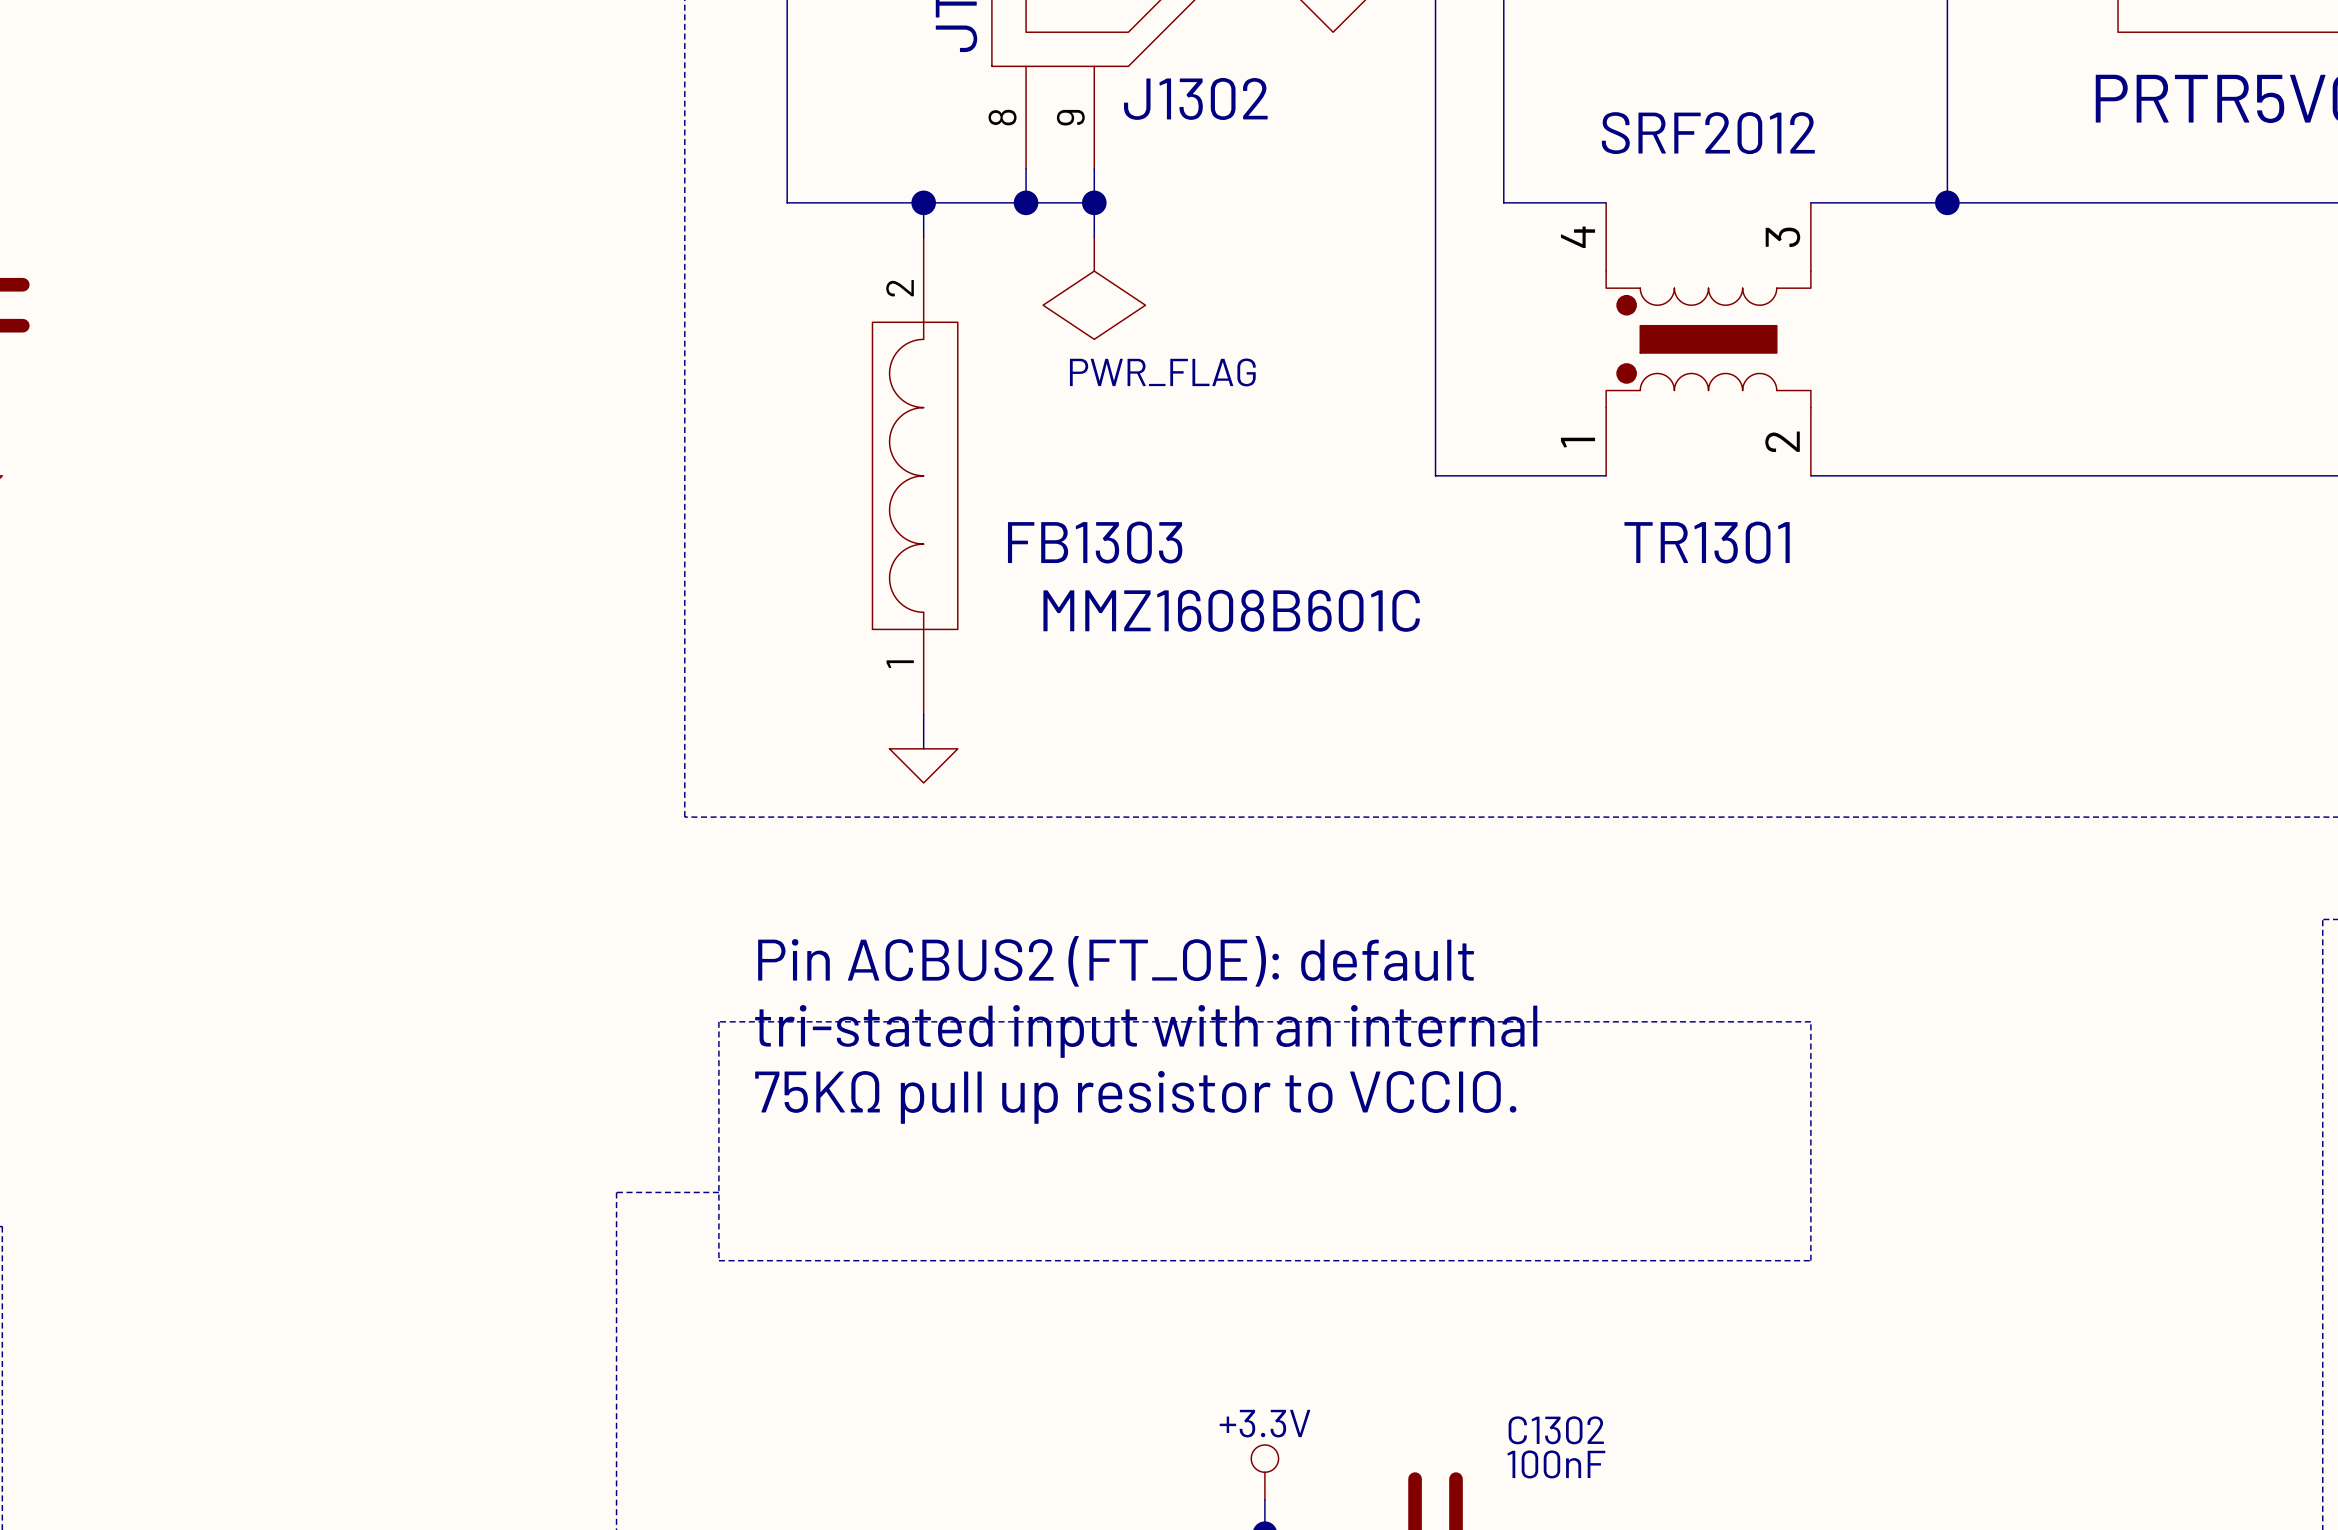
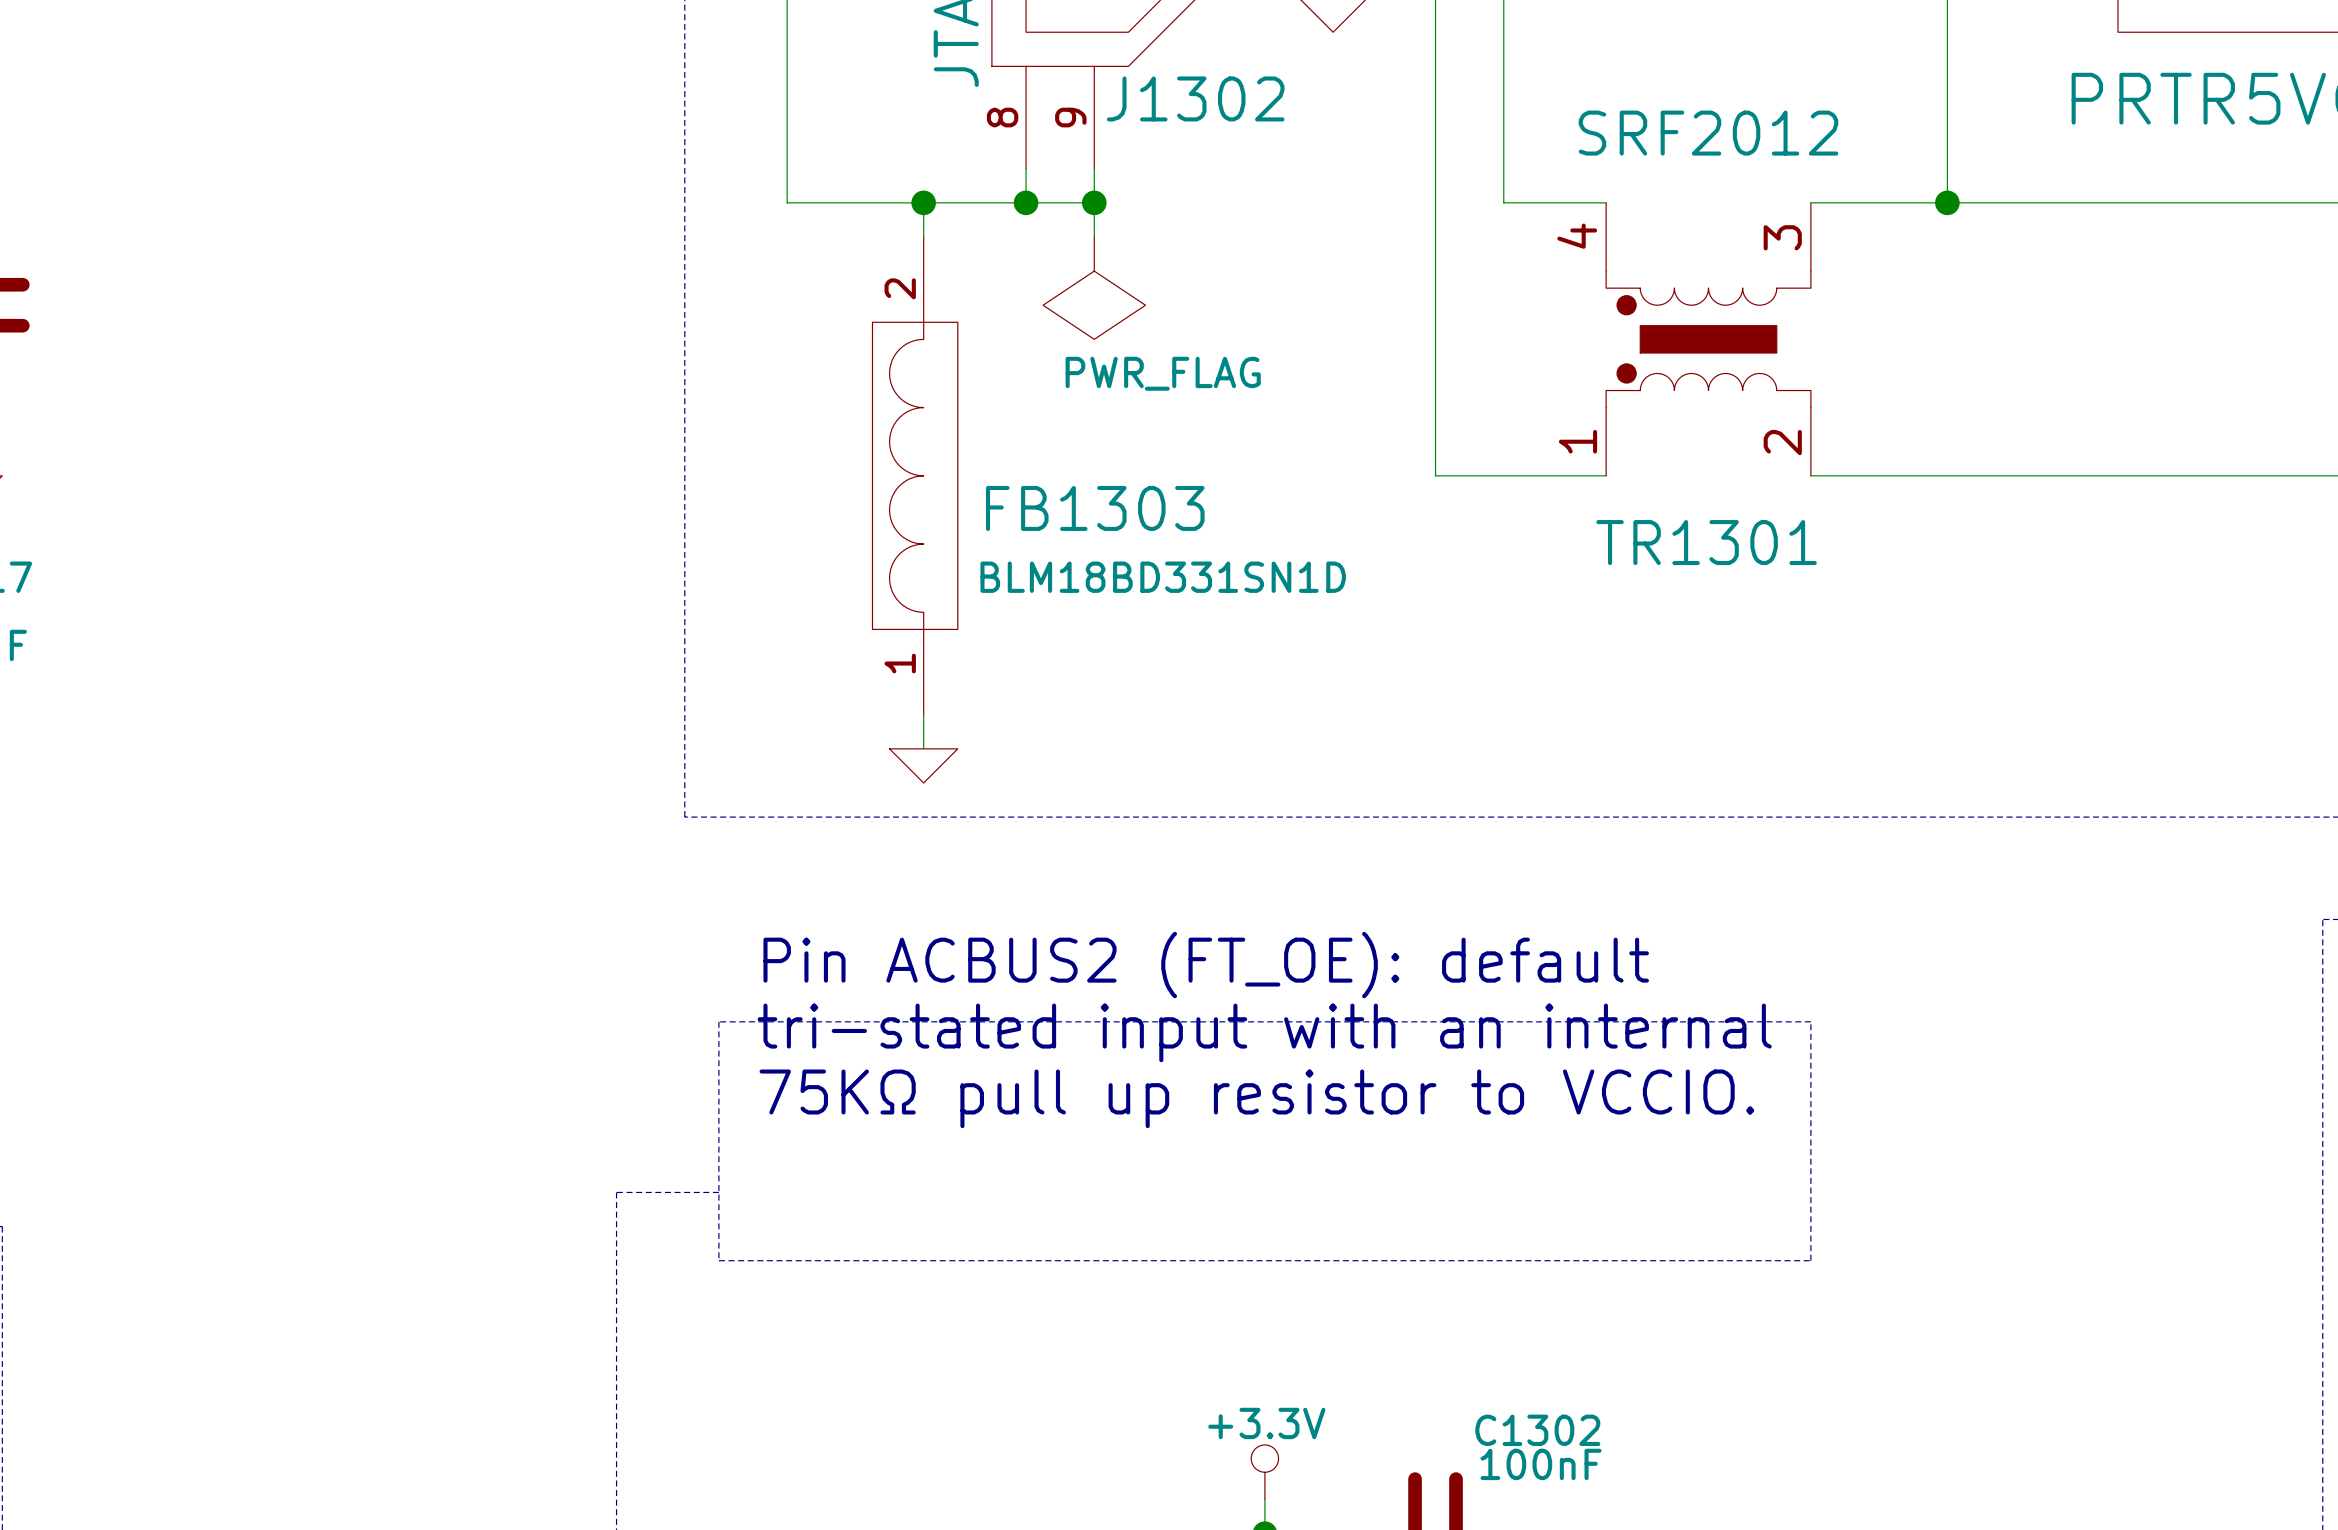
FB1303 name position: FB1303 (1095, 542) -> FB1303 (1095, 508)
FB1303 value: MMZ1608B601C (1231, 610) -> BLM18BD331SN1D (1163, 577)

